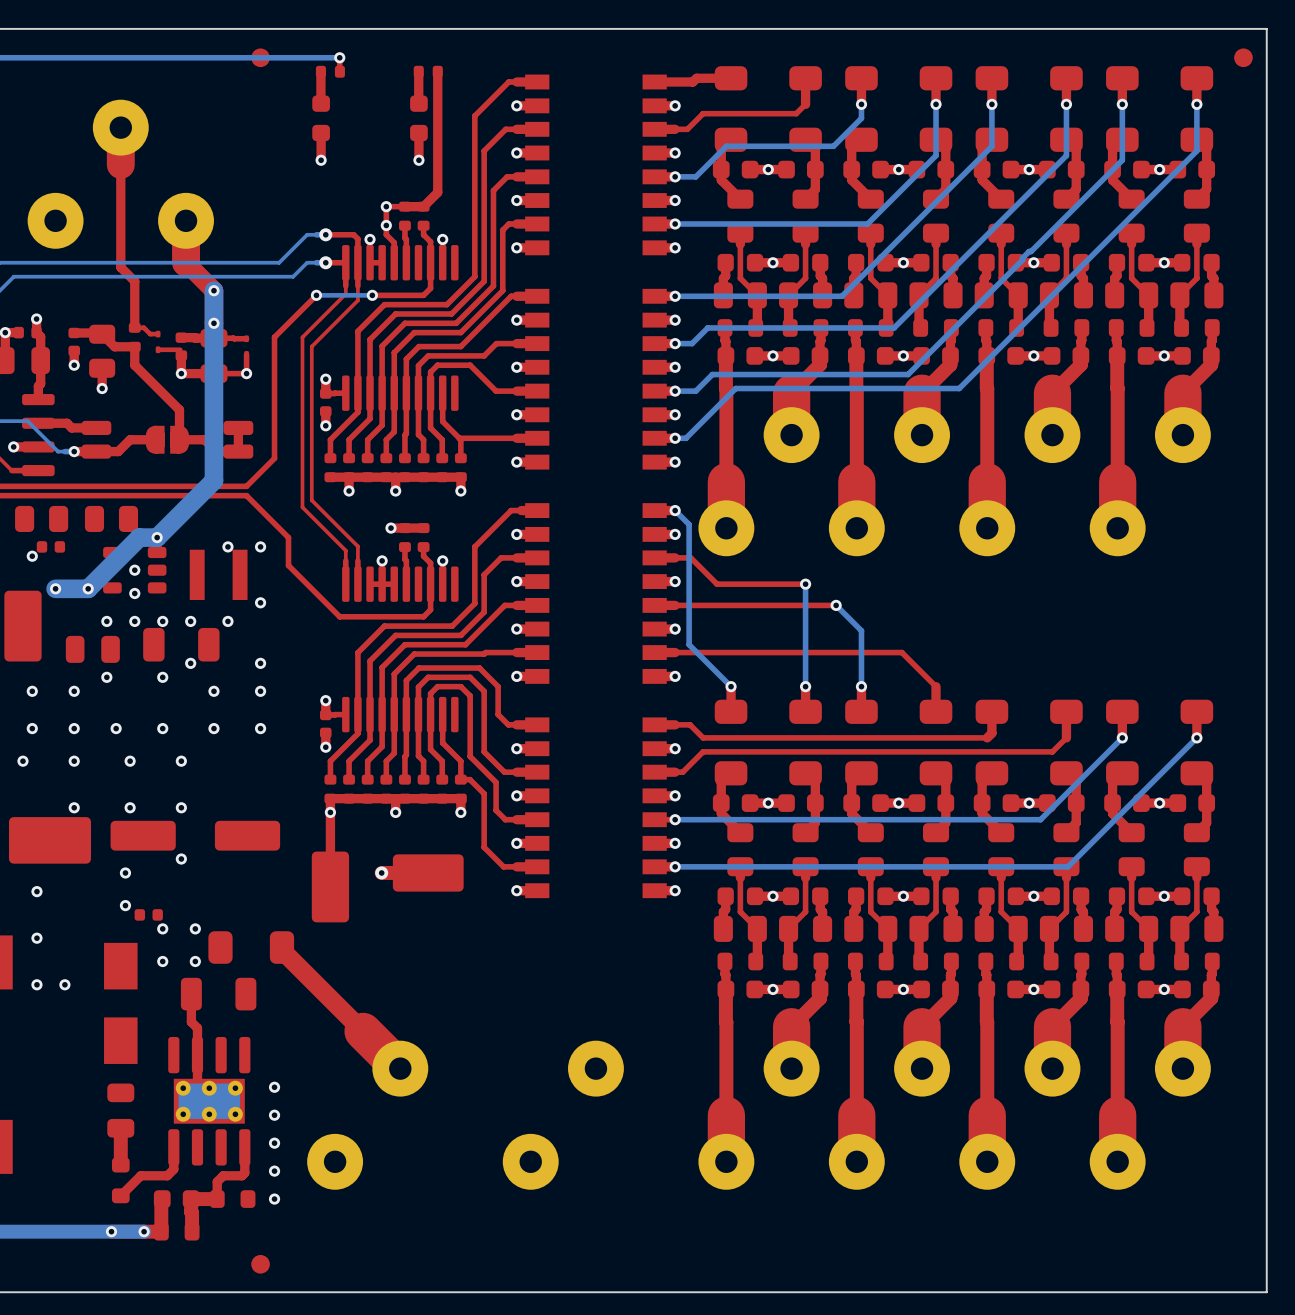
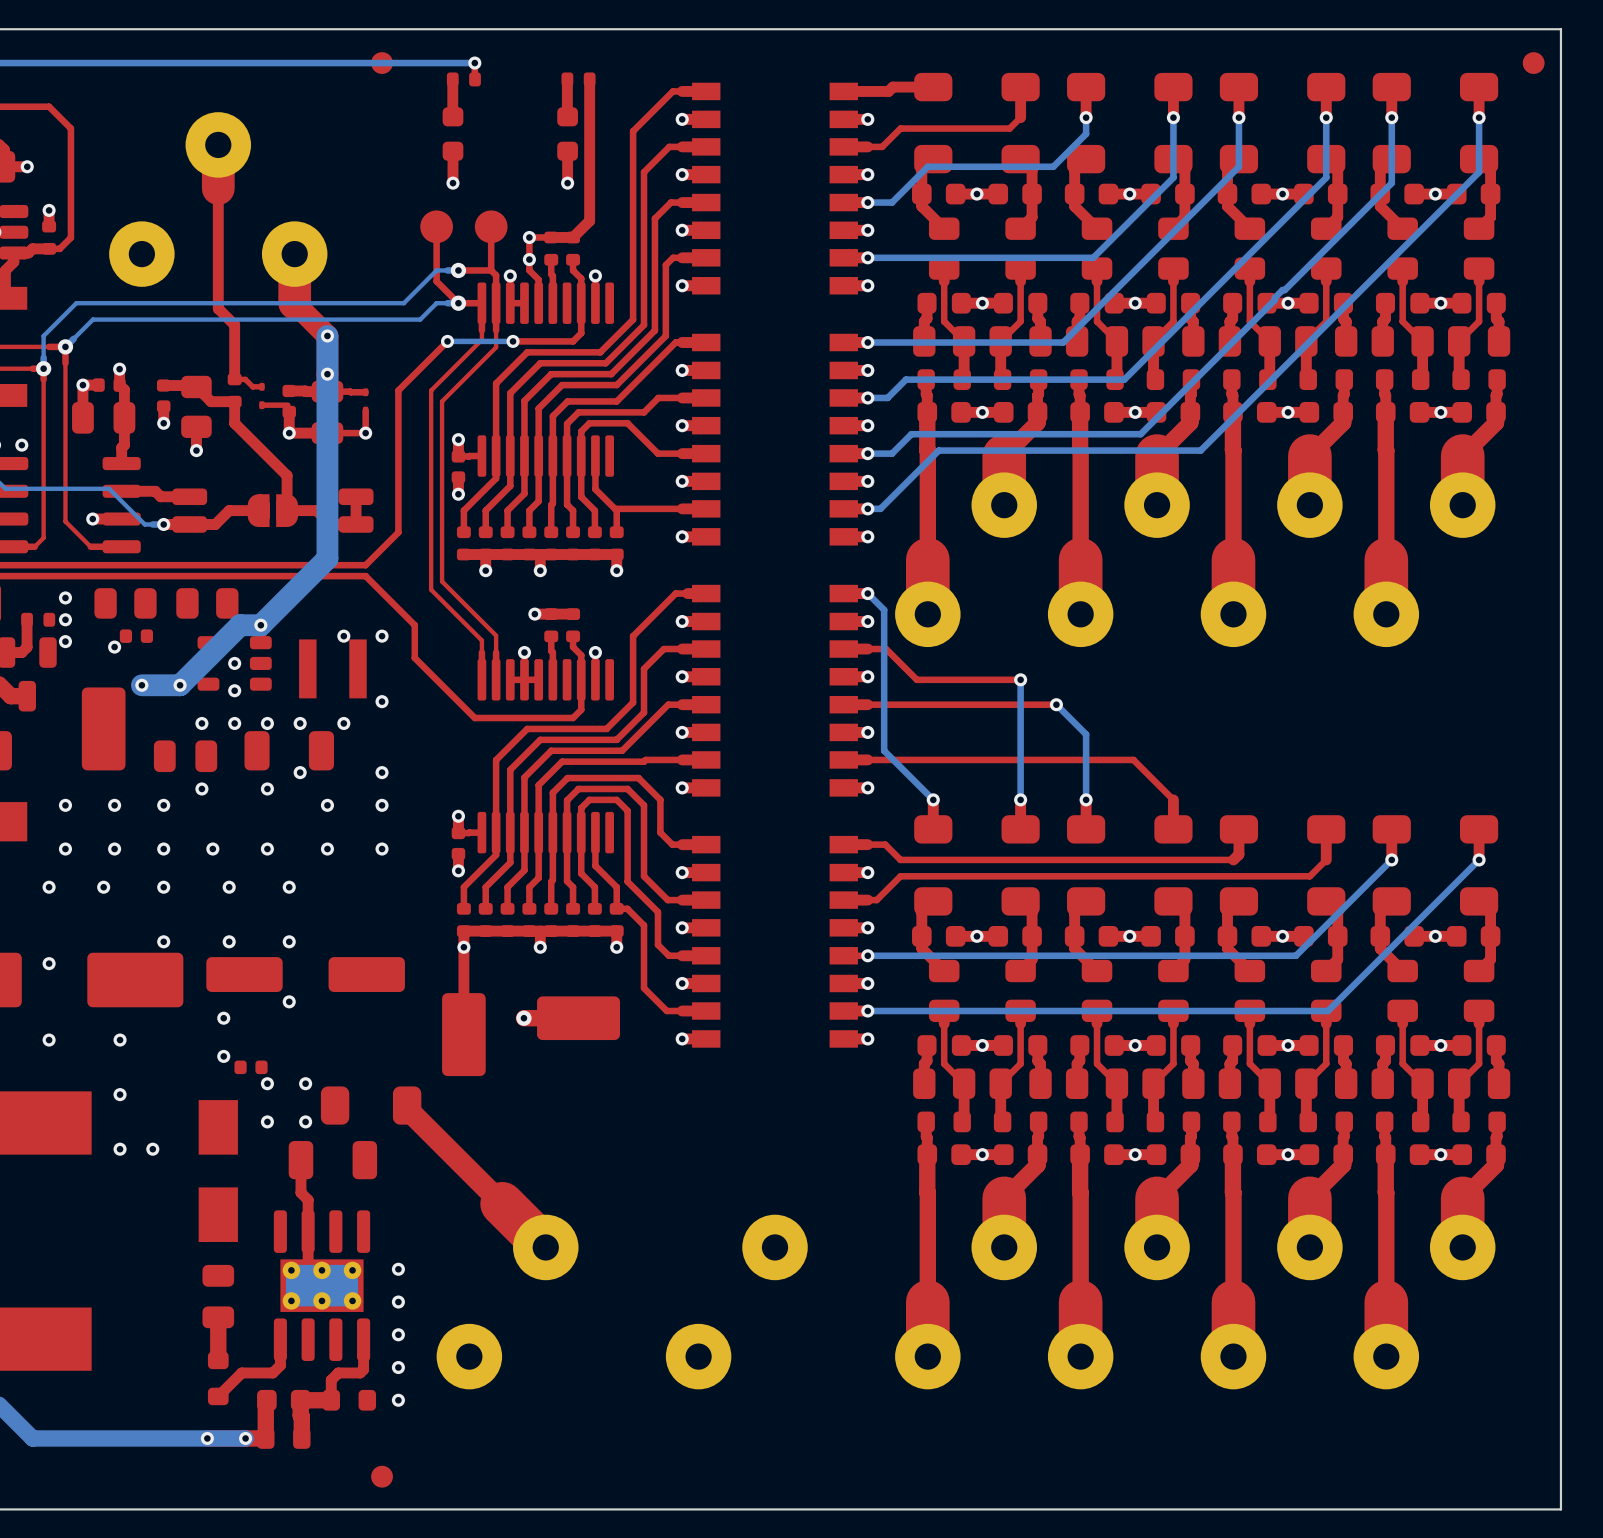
top track: none -> (436, 226) (436, 281) (458, 303)
part: none -> (436, 226)
top track: none -> (491, 226) (491, 270)
part: none -> (491, 226)

